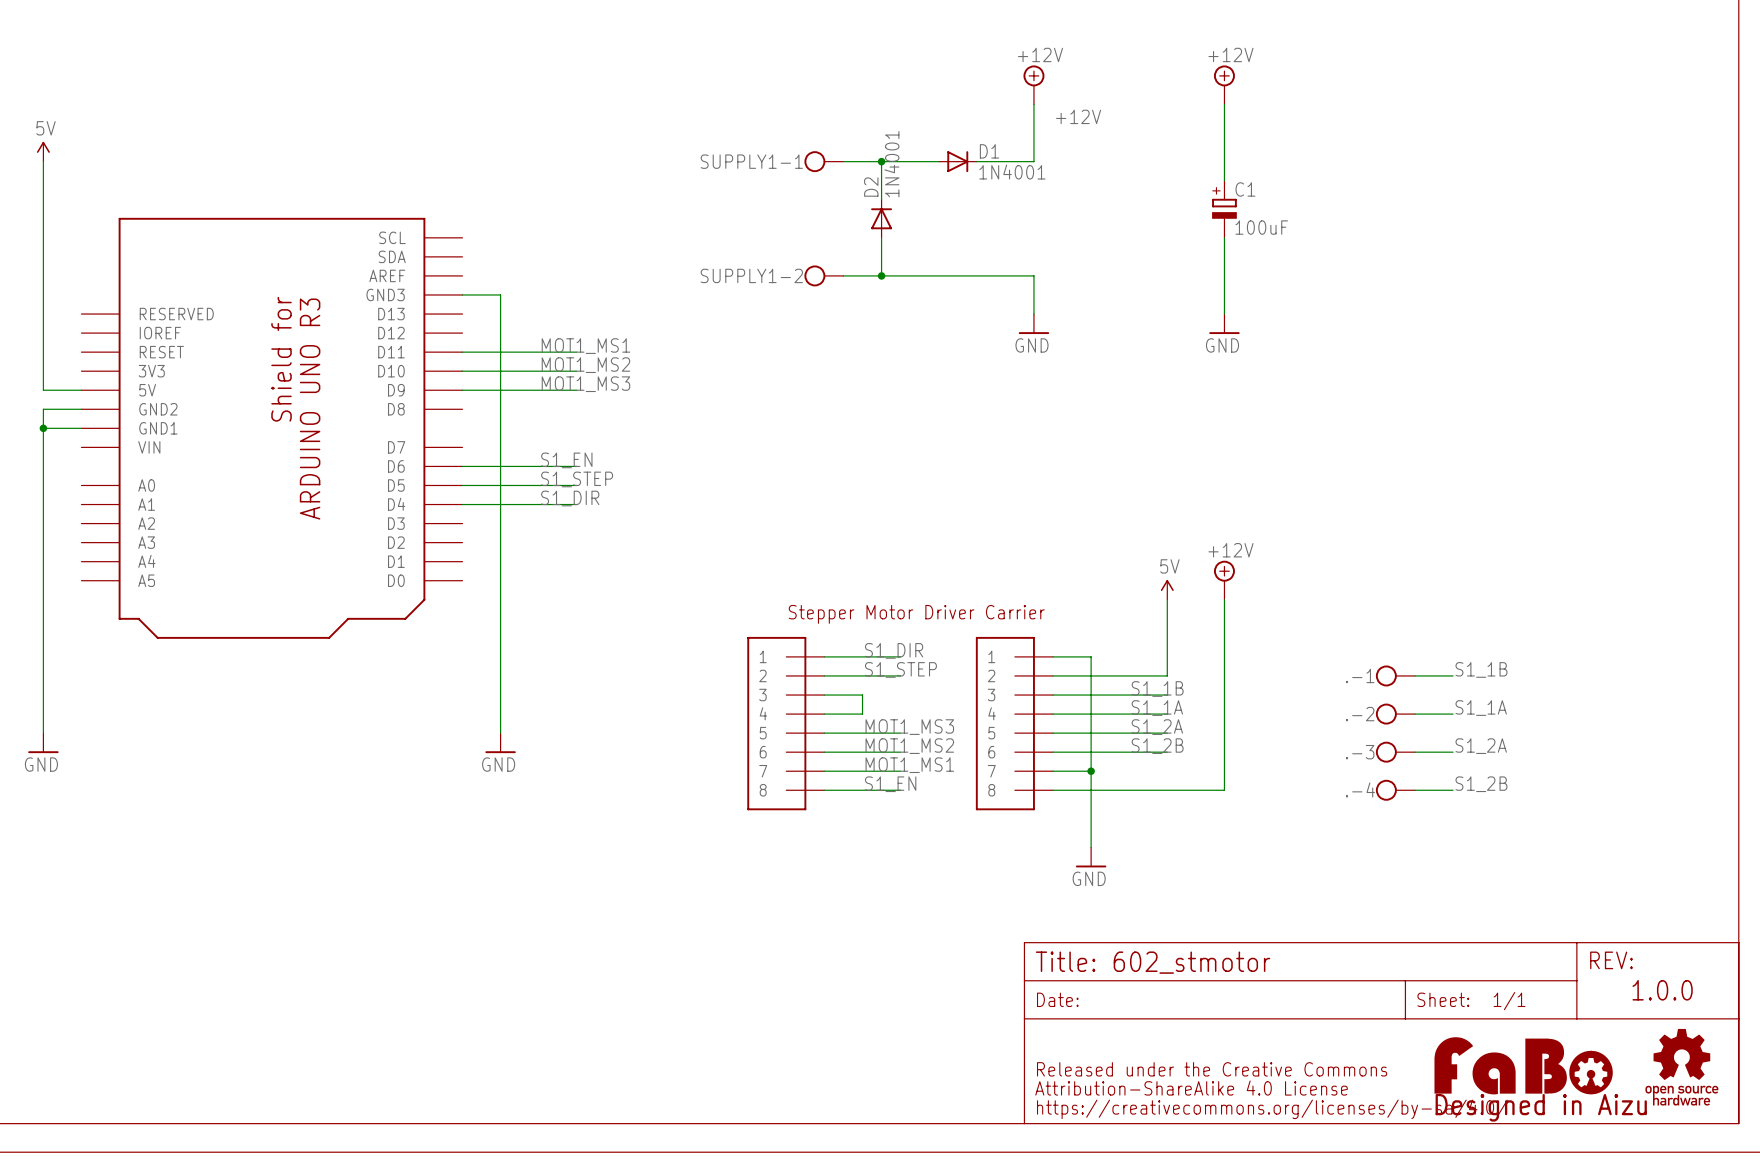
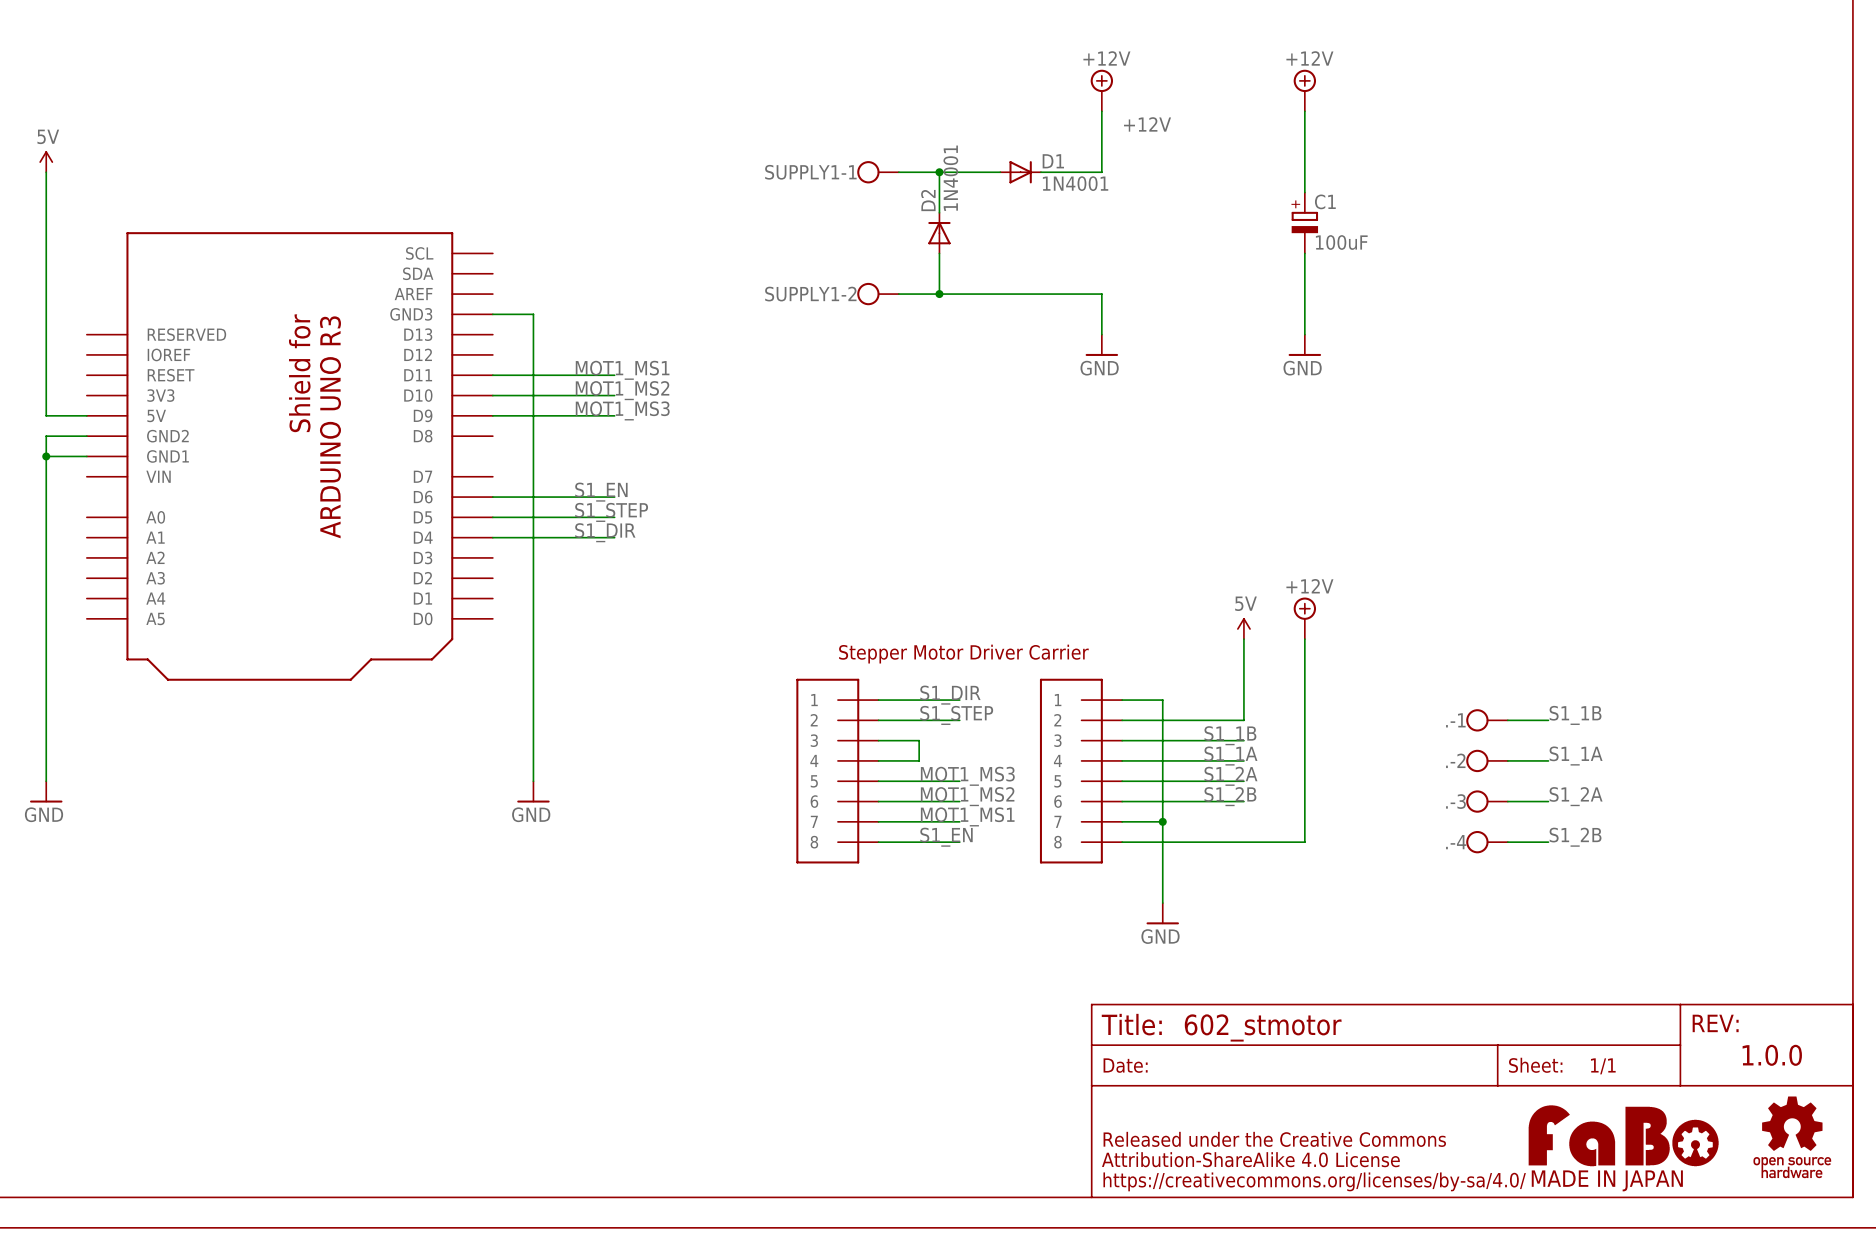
part text: none -> MADE IN JAPAN (1607, 1180)
part text: Designed in Aizu (1541, 1107) -> none

